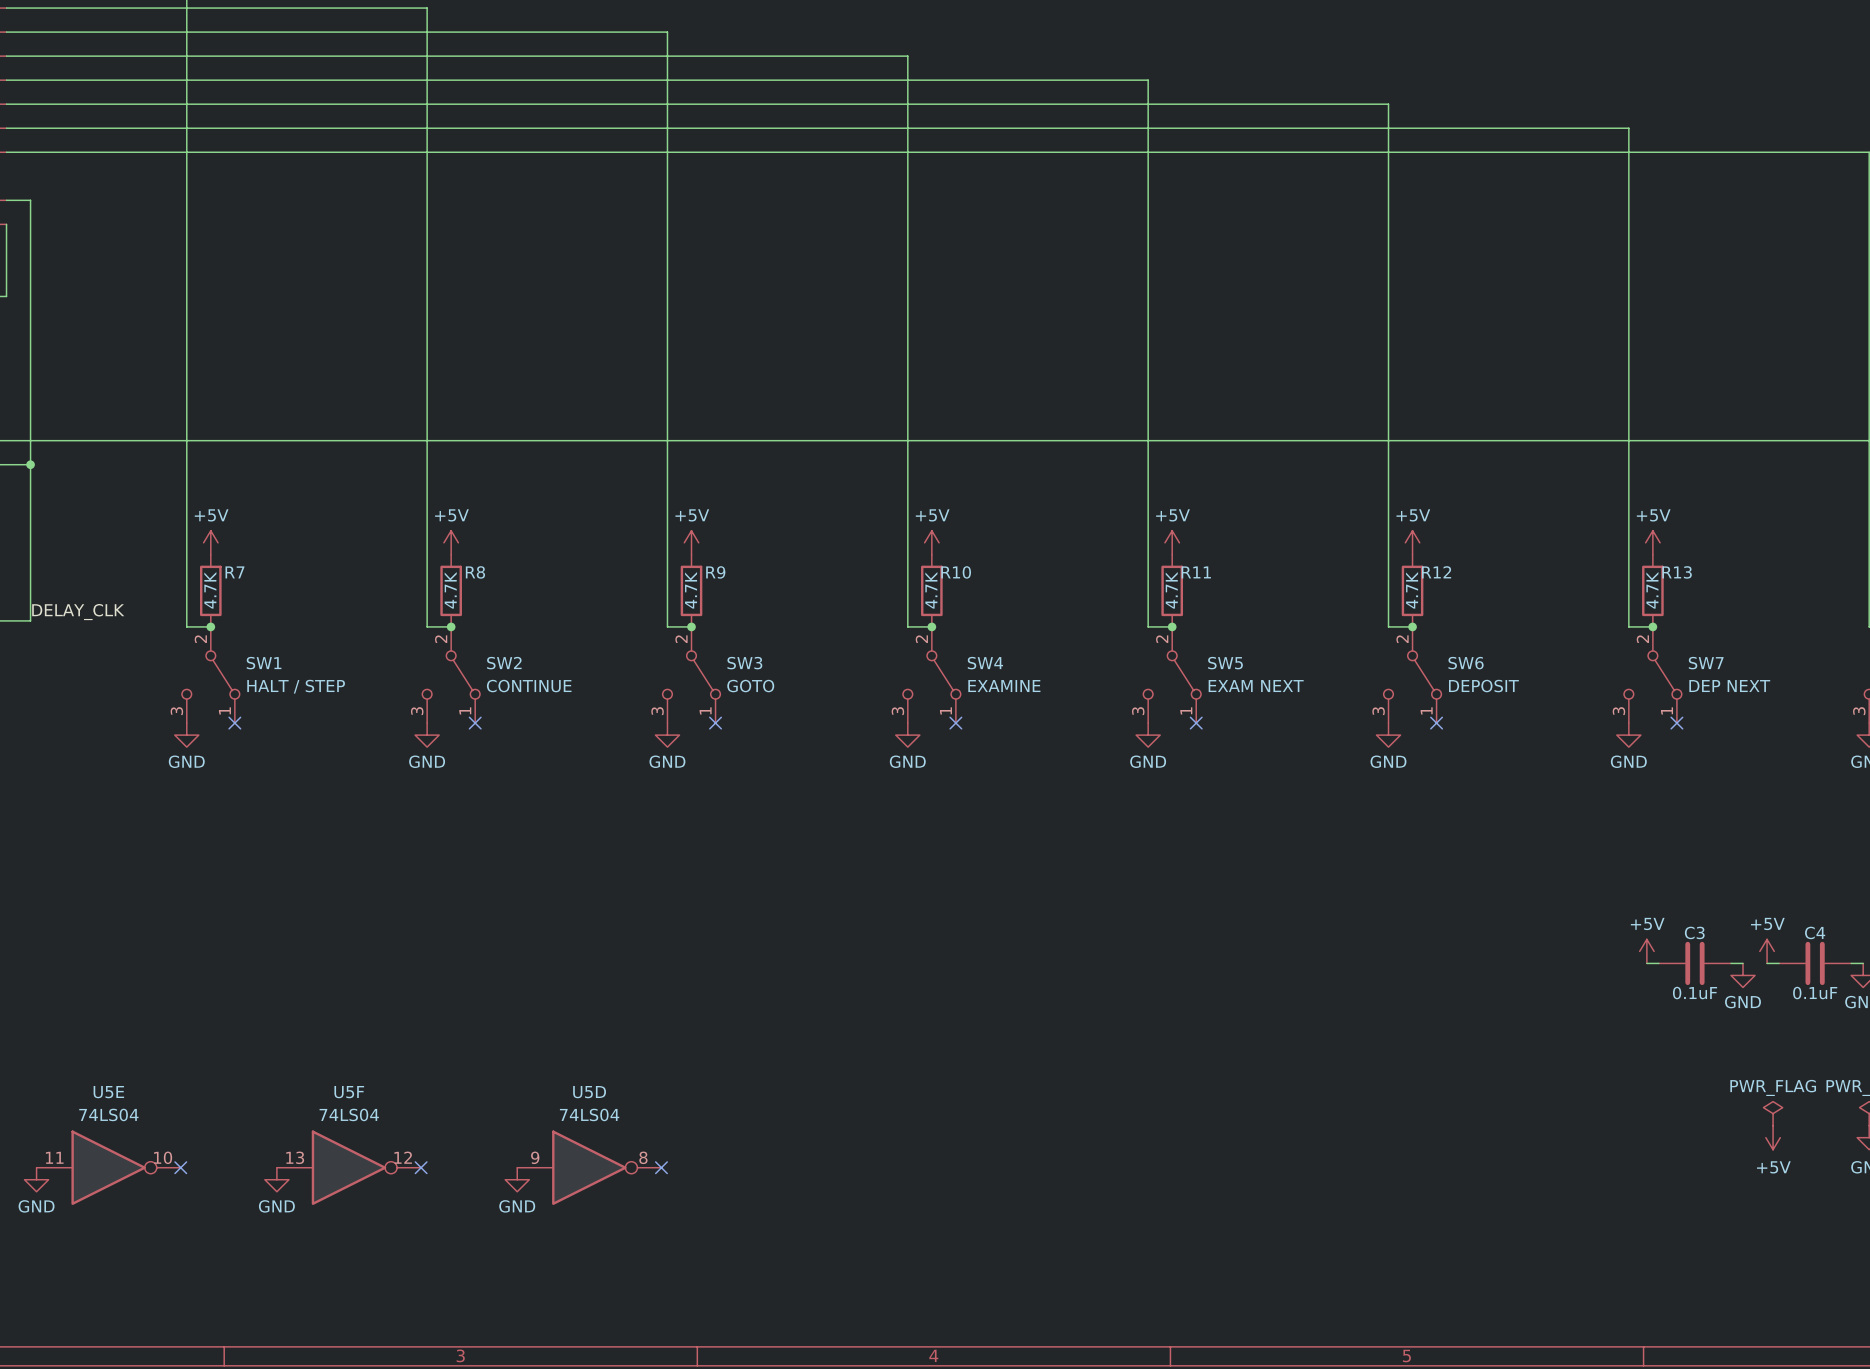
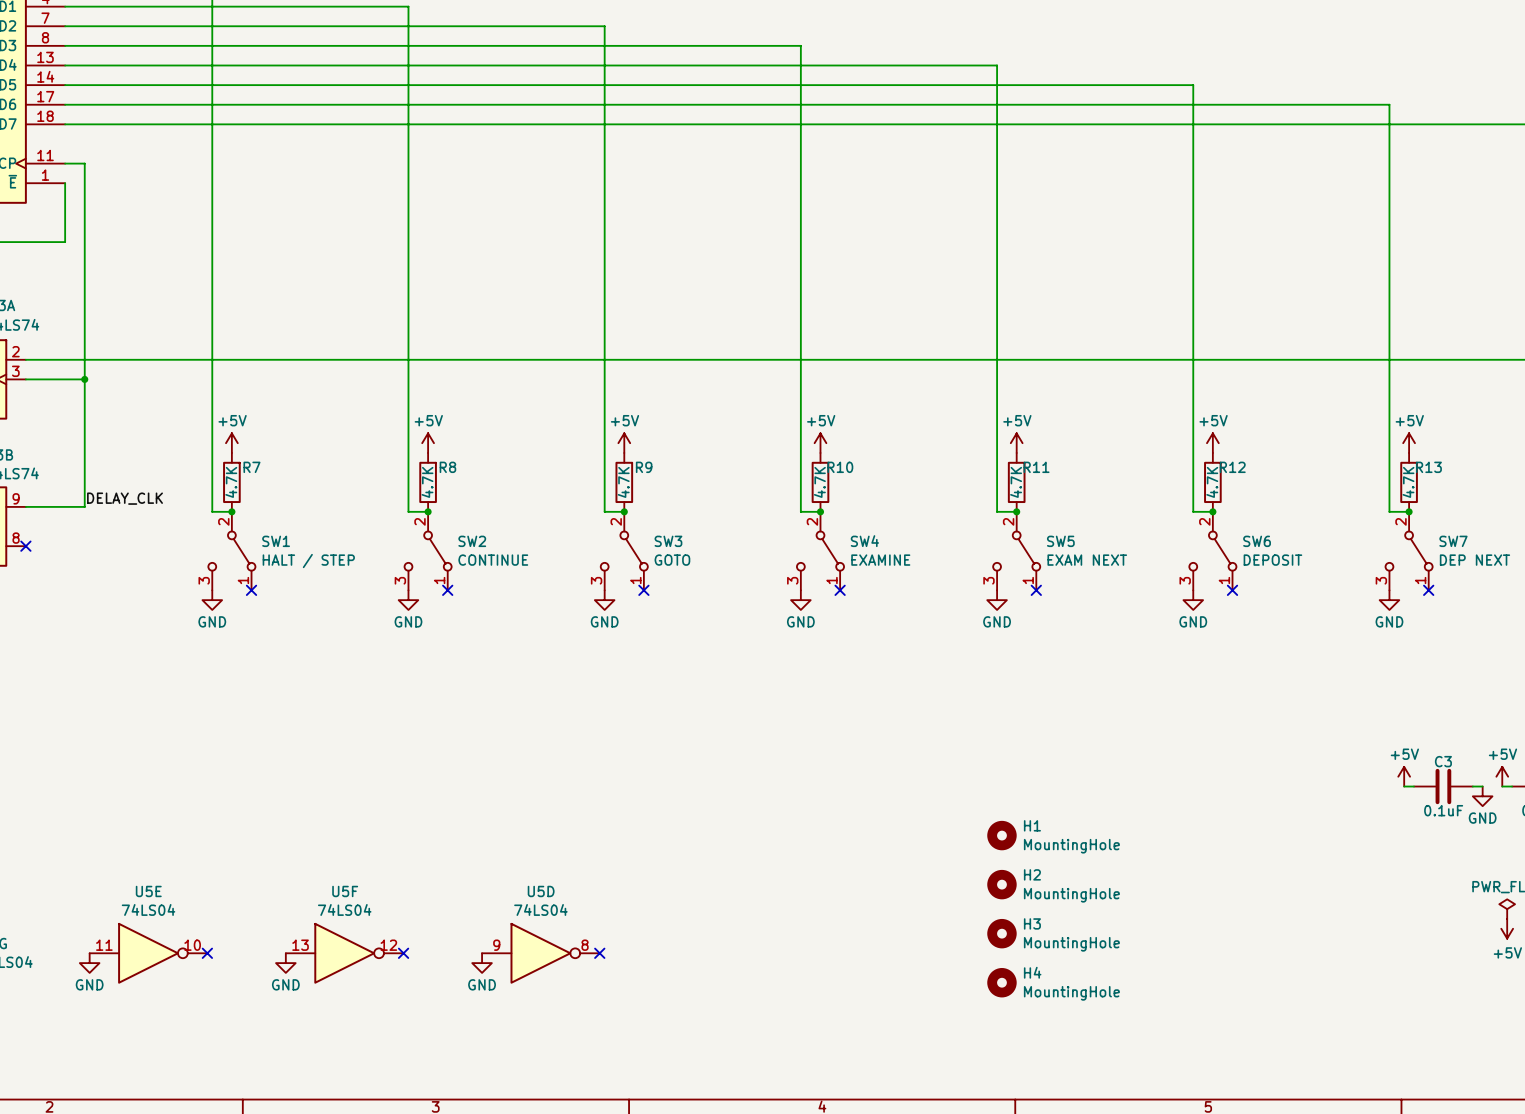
H1: none -> MountingHole (1001, 835)
H2: none -> MountingHole (1001, 884)
H3: none -> MountingHole (1001, 933)
H4: none -> MountingHole (1001, 982)

